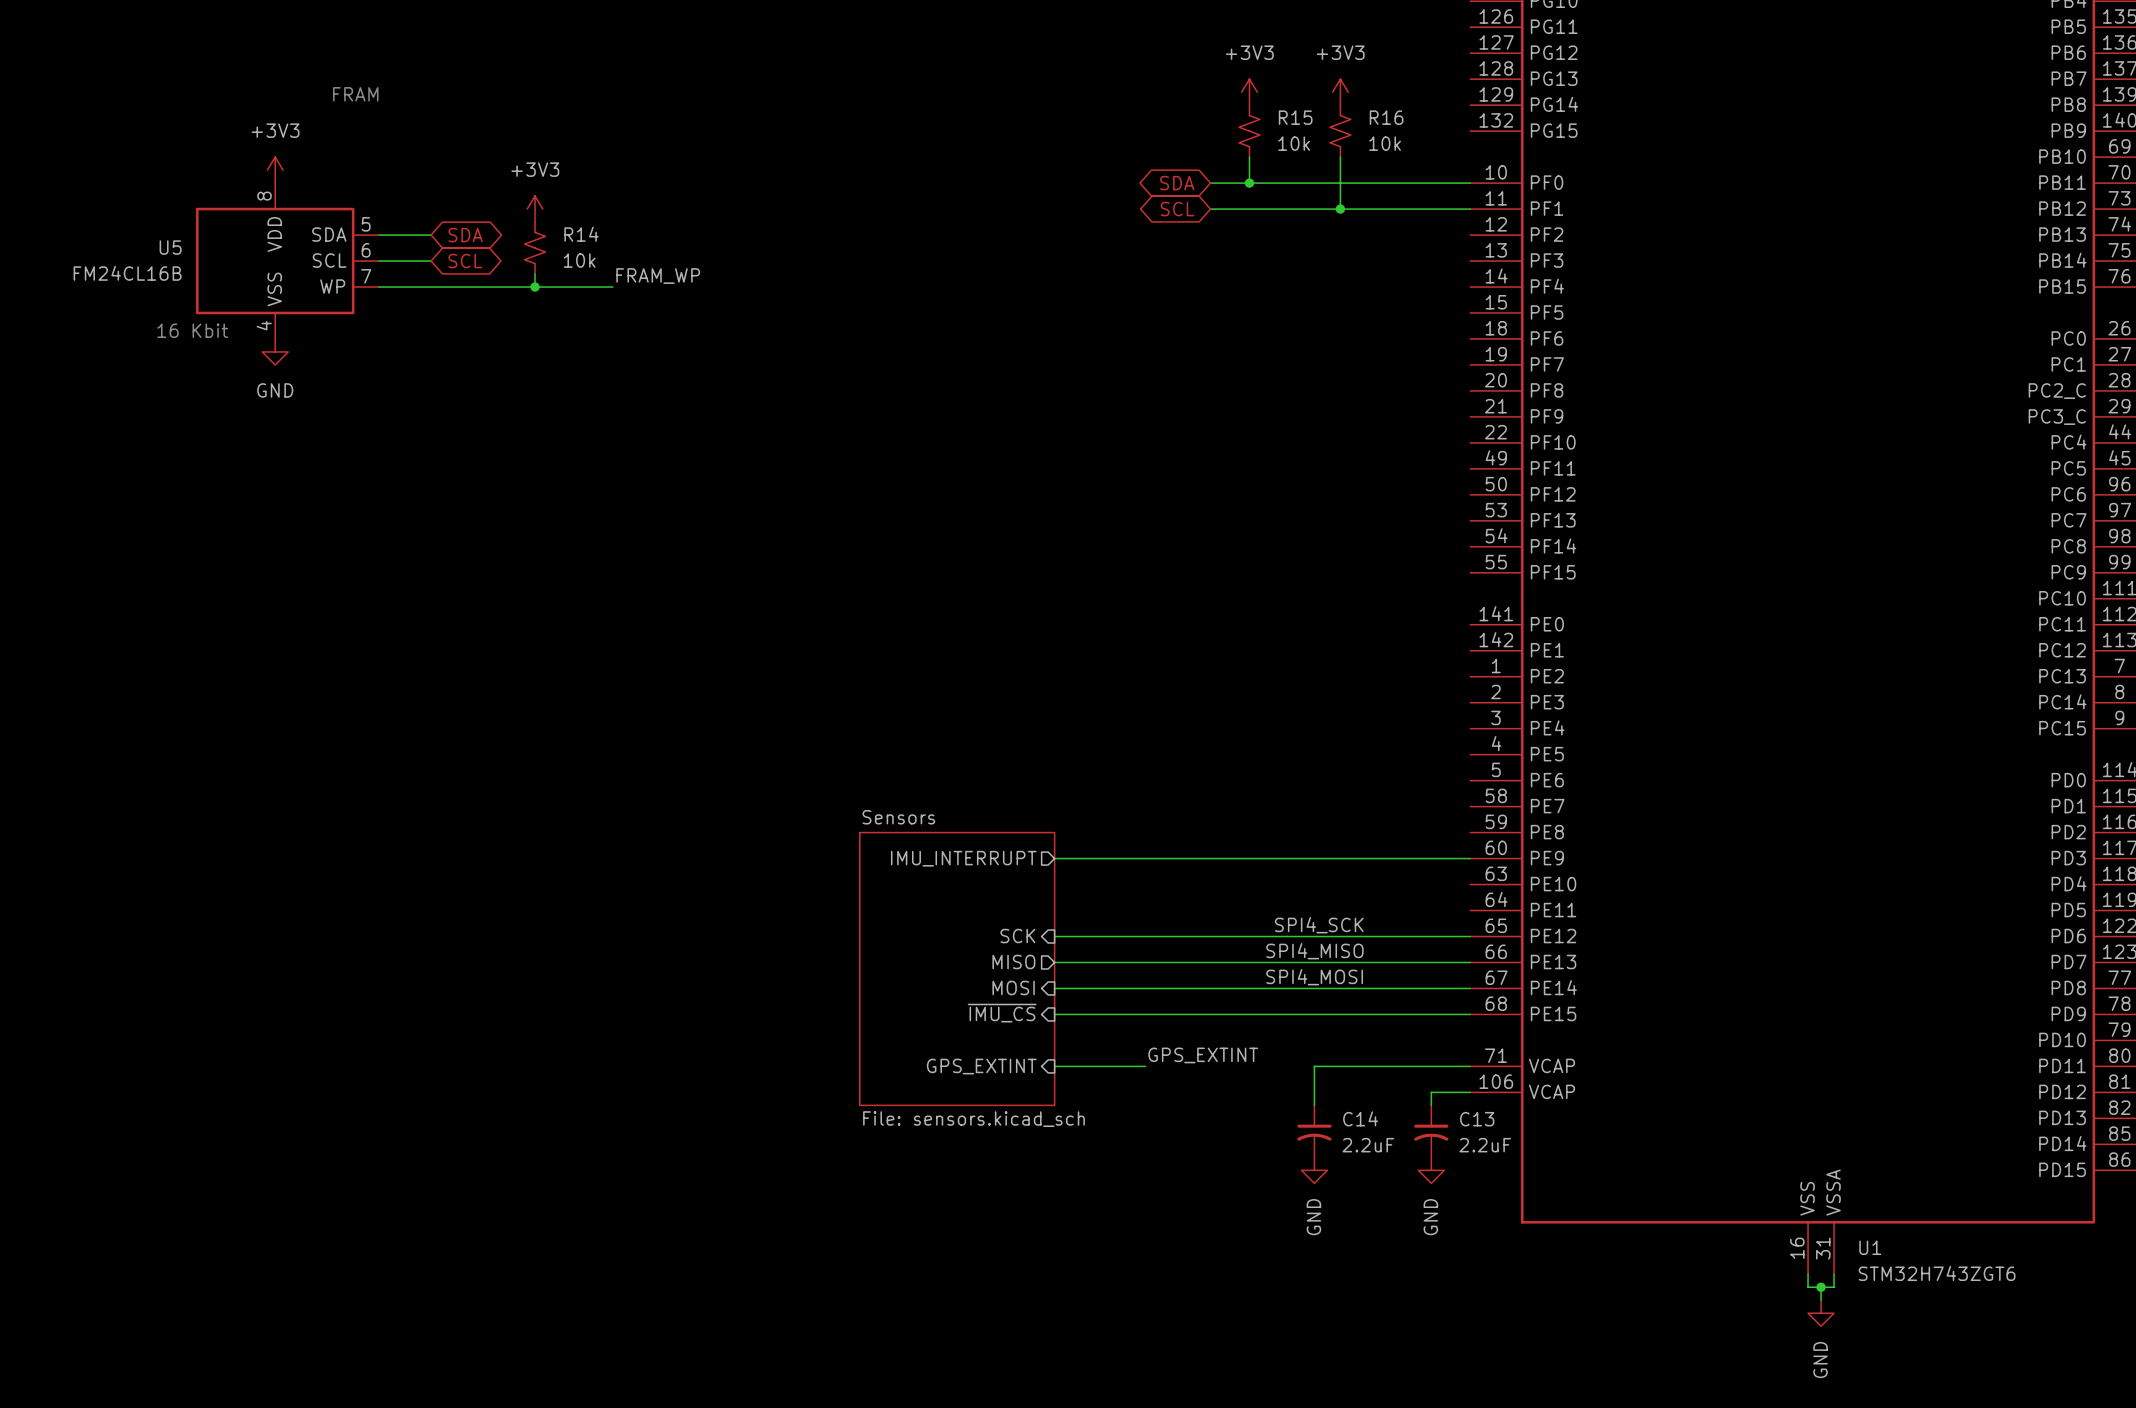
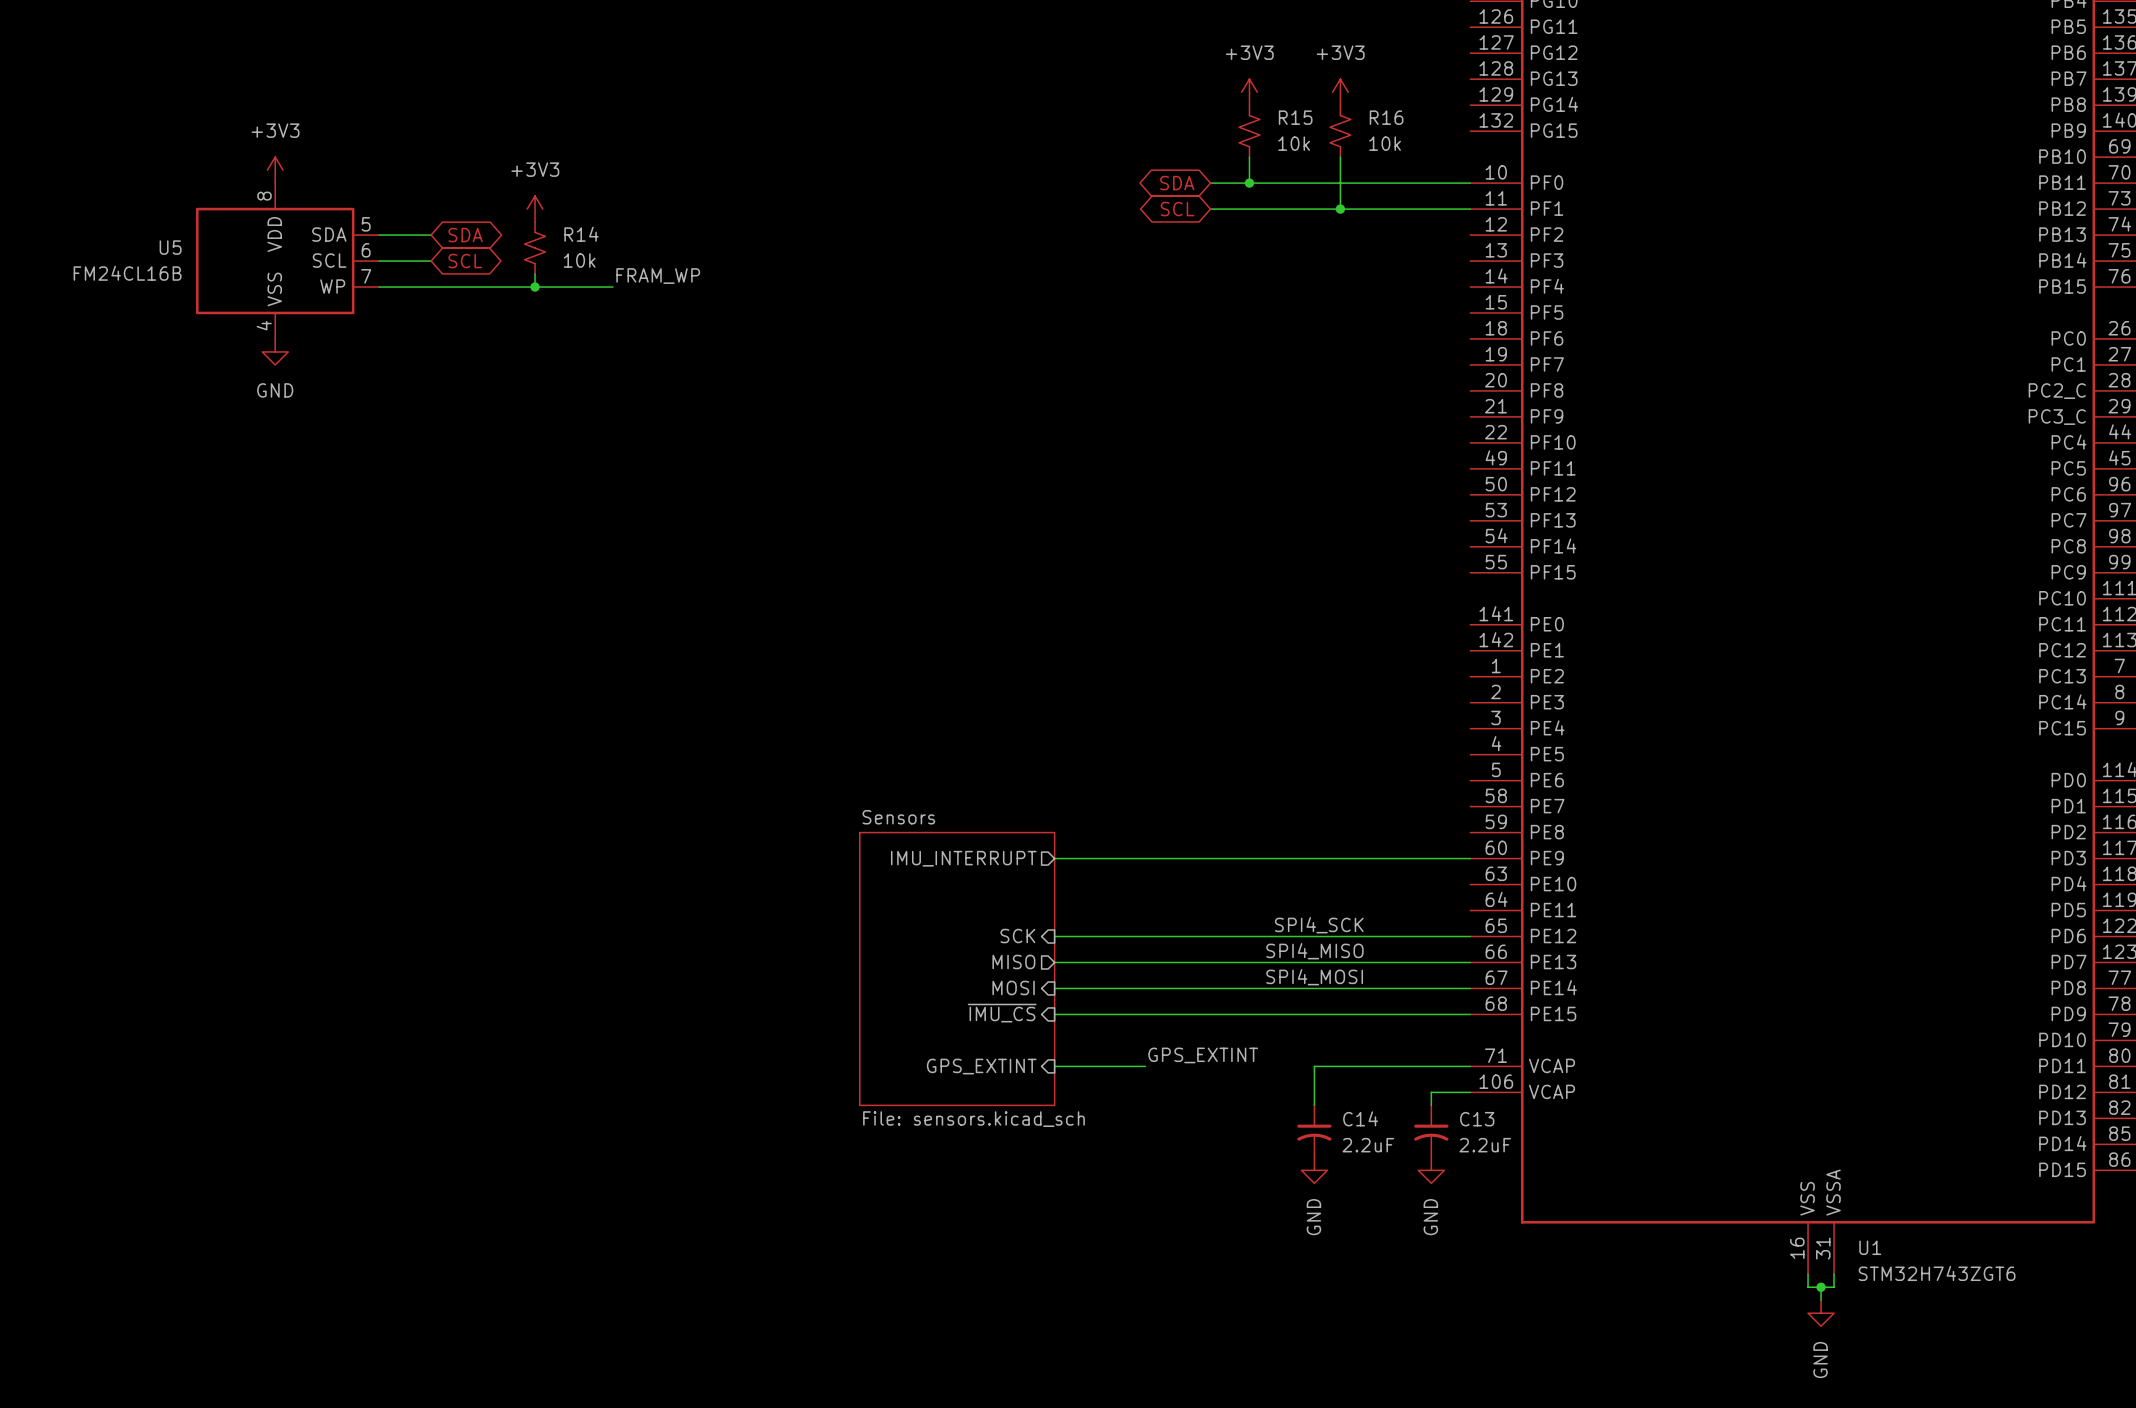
text: FRAM (355, 94) -> none
text: 16 Kbit (192, 330) -> none

